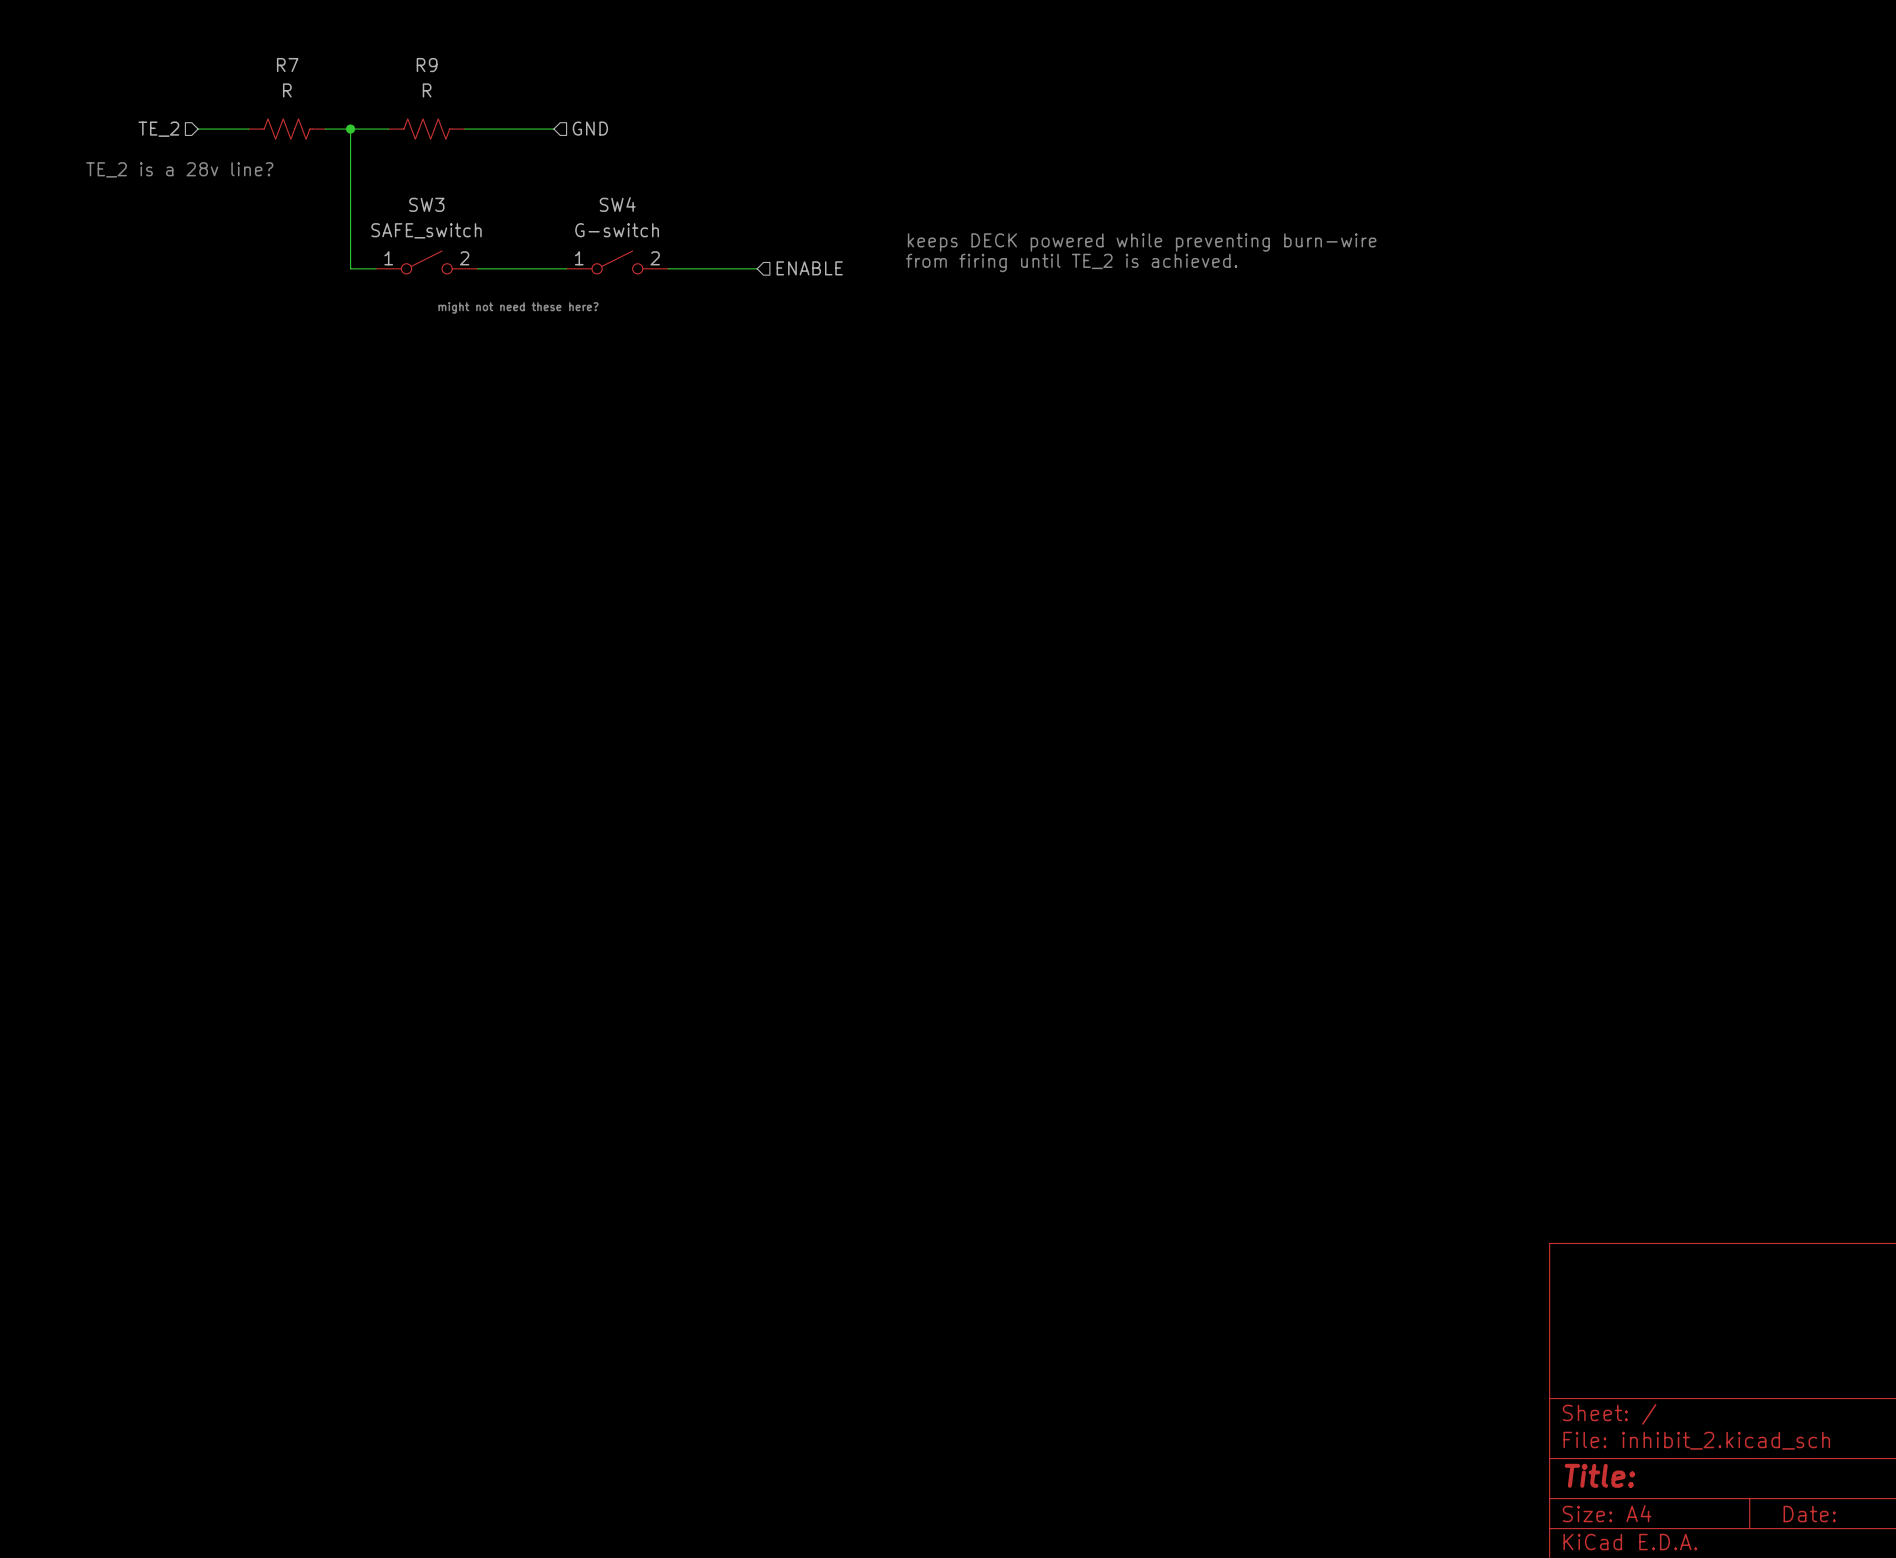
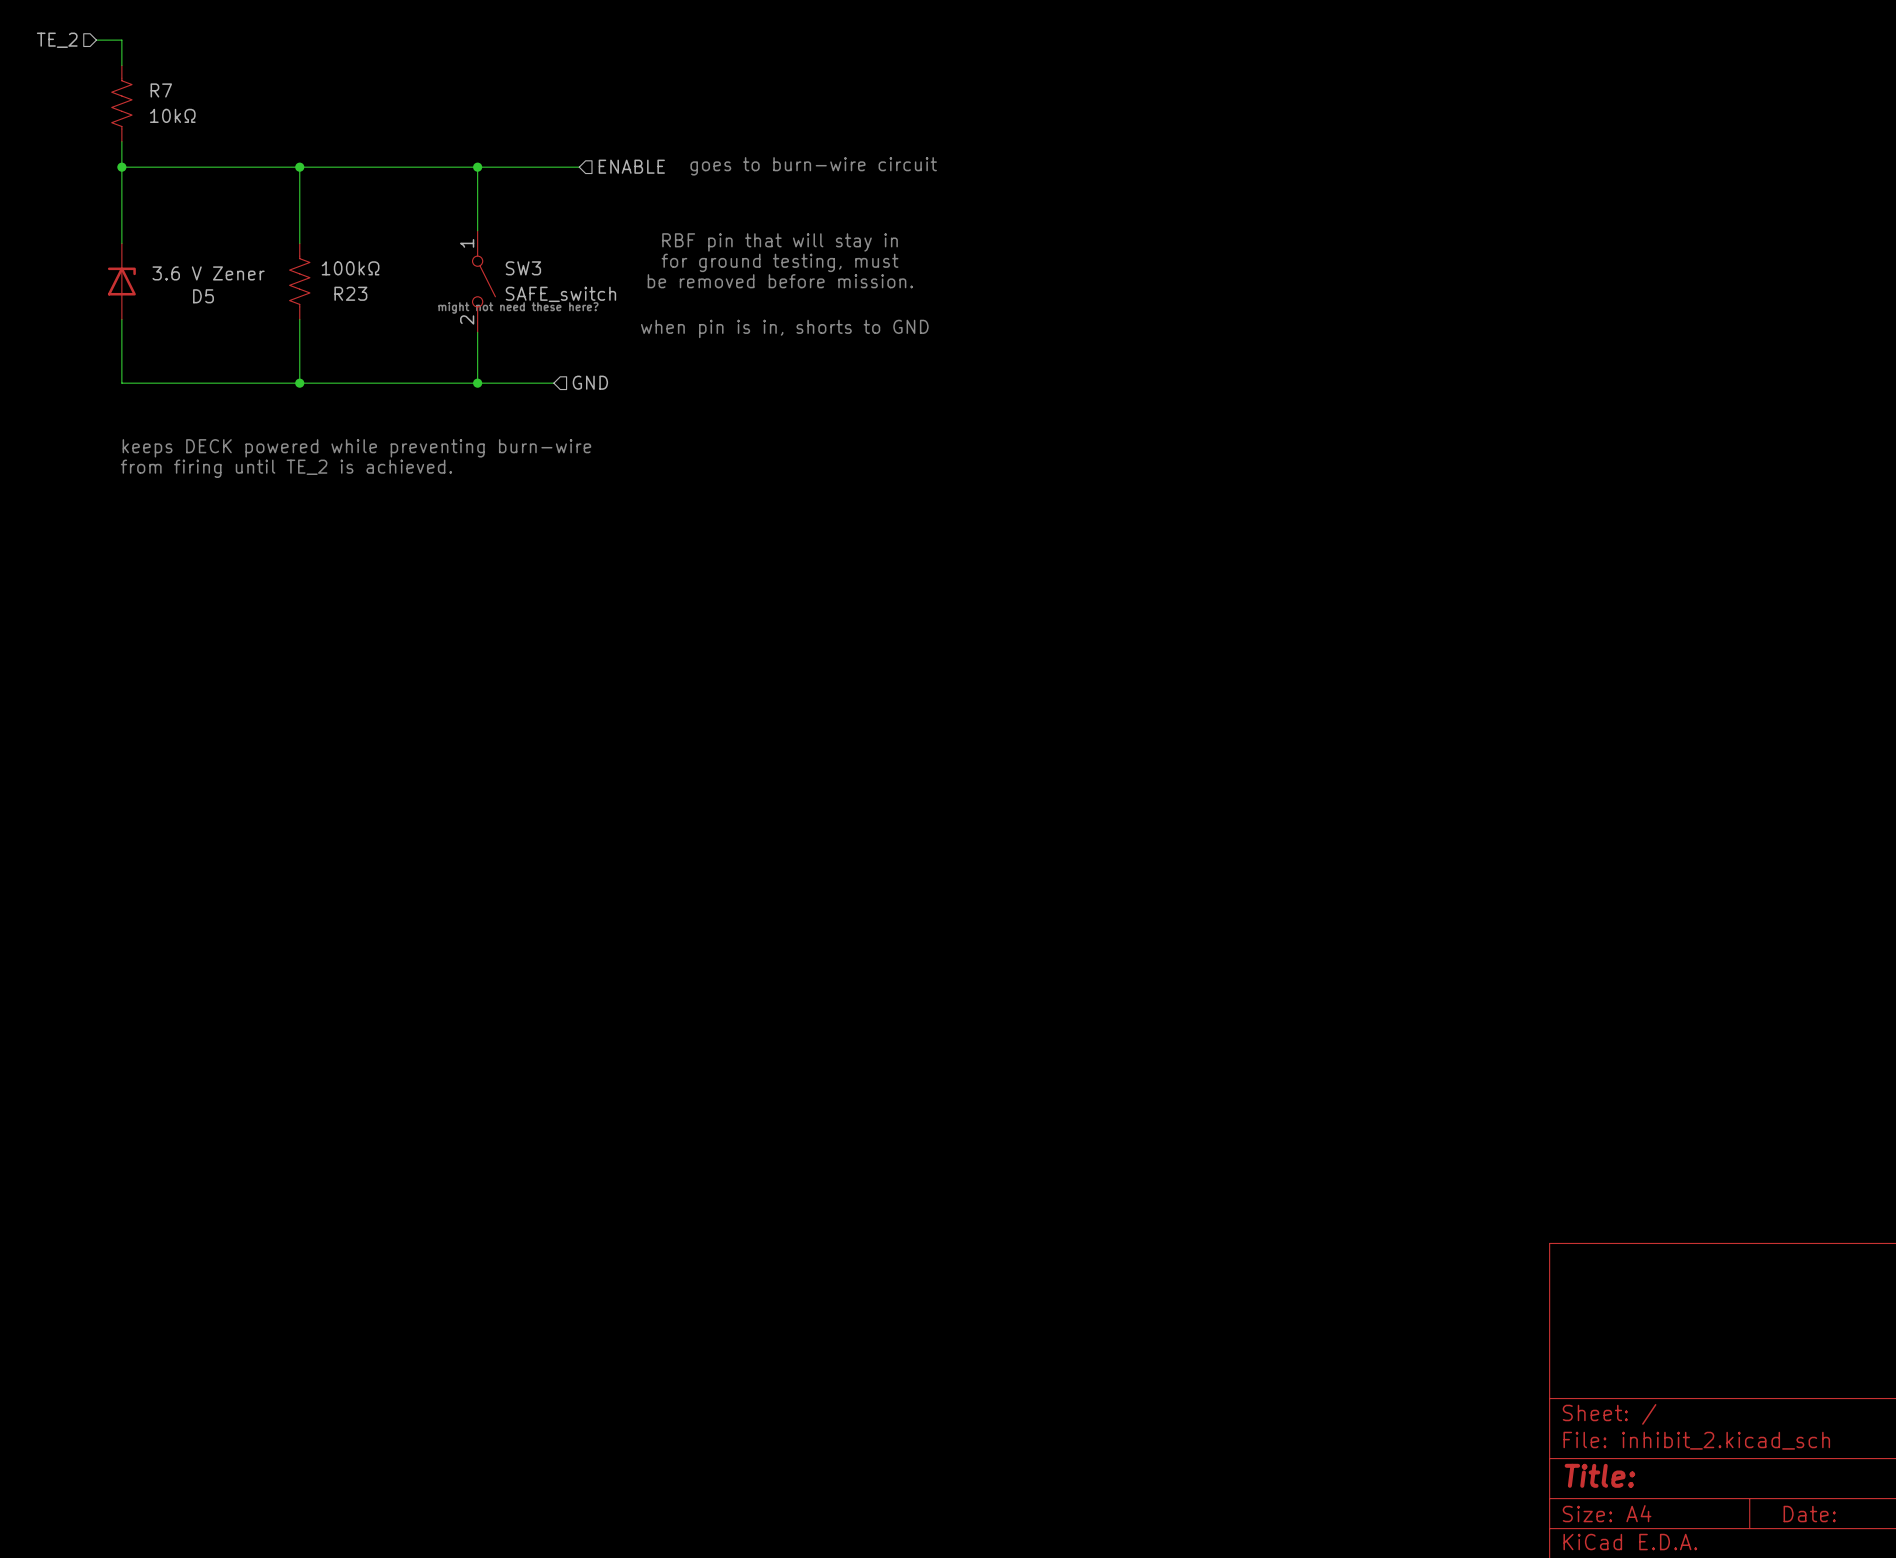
wire: none -> (96, 40) (121, 40) (121, 65)
R7 name position: R7 (287, 65) -> R7 (161, 90)
R7 value: R (287, 90) -> 10kΩ (172, 115)
hierarchical label: GND (590, 128) -> none
hierarchical label position: TE_2 (158, 129) -> TE_2 (57, 40)
wire: (198, 129) (248, 129) -> none
R7 rotation: 0° (287, 129) -> 90° clockwise (121, 103)
R7 position: (287, 129) -> (121, 103)
wire: (325, 129) (388, 129) -> none
wire: (350, 129) (350, 268) (375, 268) -> none
junction: (350, 129) -> none
R9: R (426, 129) -> none
wire: (464, 129) (553, 129) -> none
wire: none -> (121, 141) (121, 243)
text: none -> goes to burn-wire circuit (813, 166)
wire: none -> (121, 167) (579, 167)
junction: none -> (121, 167)
wire: none -> (299, 167) (299, 243)
junction: none -> (299, 167)
wire: none -> (477, 167) (477, 230)
junction: none -> (477, 167)
text: TE_2 is a 28v line? (179, 169) -> none
SW3 value position: SAFE_switch (426, 230) -> SAFE_switch (560, 294)
text: none -> RBF pin that will stay in (780, 242)
text: keeps DECK powered while preventing burn-wire (1142, 242) -> none
SW3 rotation: 0° (426, 262) -> 90° clockwise (483, 281)
SW4: G-switch (617, 262) -> none
text: none -> for ground testing, must (780, 262)
text: from firing until TE_2 is achieved. (1071, 262) -> none
wire: (477, 268) (566, 268) -> none
wire: (668, 268) (757, 268) -> none
hierarchical label position: ENABLE (809, 268) -> ENABLE (631, 166)
D5: none -> 3.6 V Zener (121, 281)
R23: none -> 100kΩ (299, 281)
text: none -> be removed before mission. (780, 281)
wire: none -> (121, 319) (121, 383) (553, 383)
wire: none -> (299, 319) (299, 383)
text: none -> when pin is in, shorts to GND (784, 328)
wire: none -> (477, 332) (477, 383)
hierarchical label: none -> GND (590, 382)
junction: none -> (299, 383)
junction: none -> (477, 383)
text: none -> keeps DECK powered while preventing burn-wire (356, 448)
text: none -> from firing until TE_2 is achieved. (286, 468)

